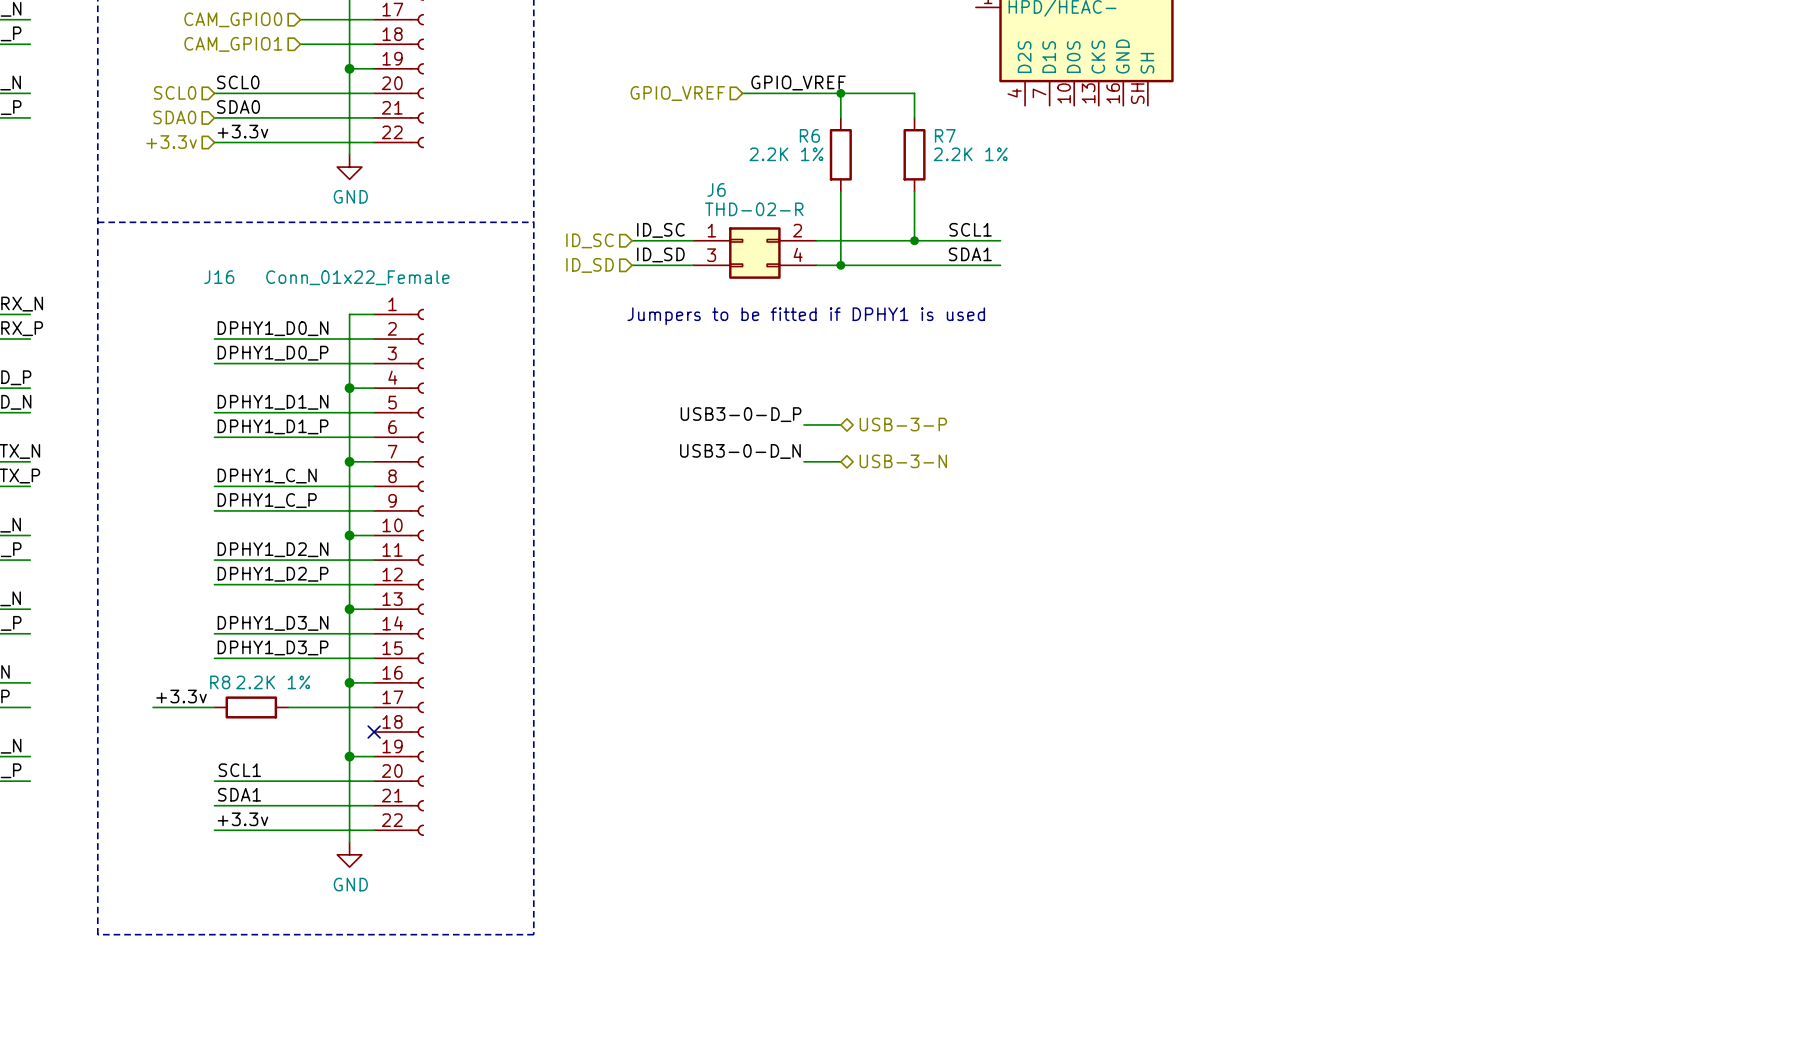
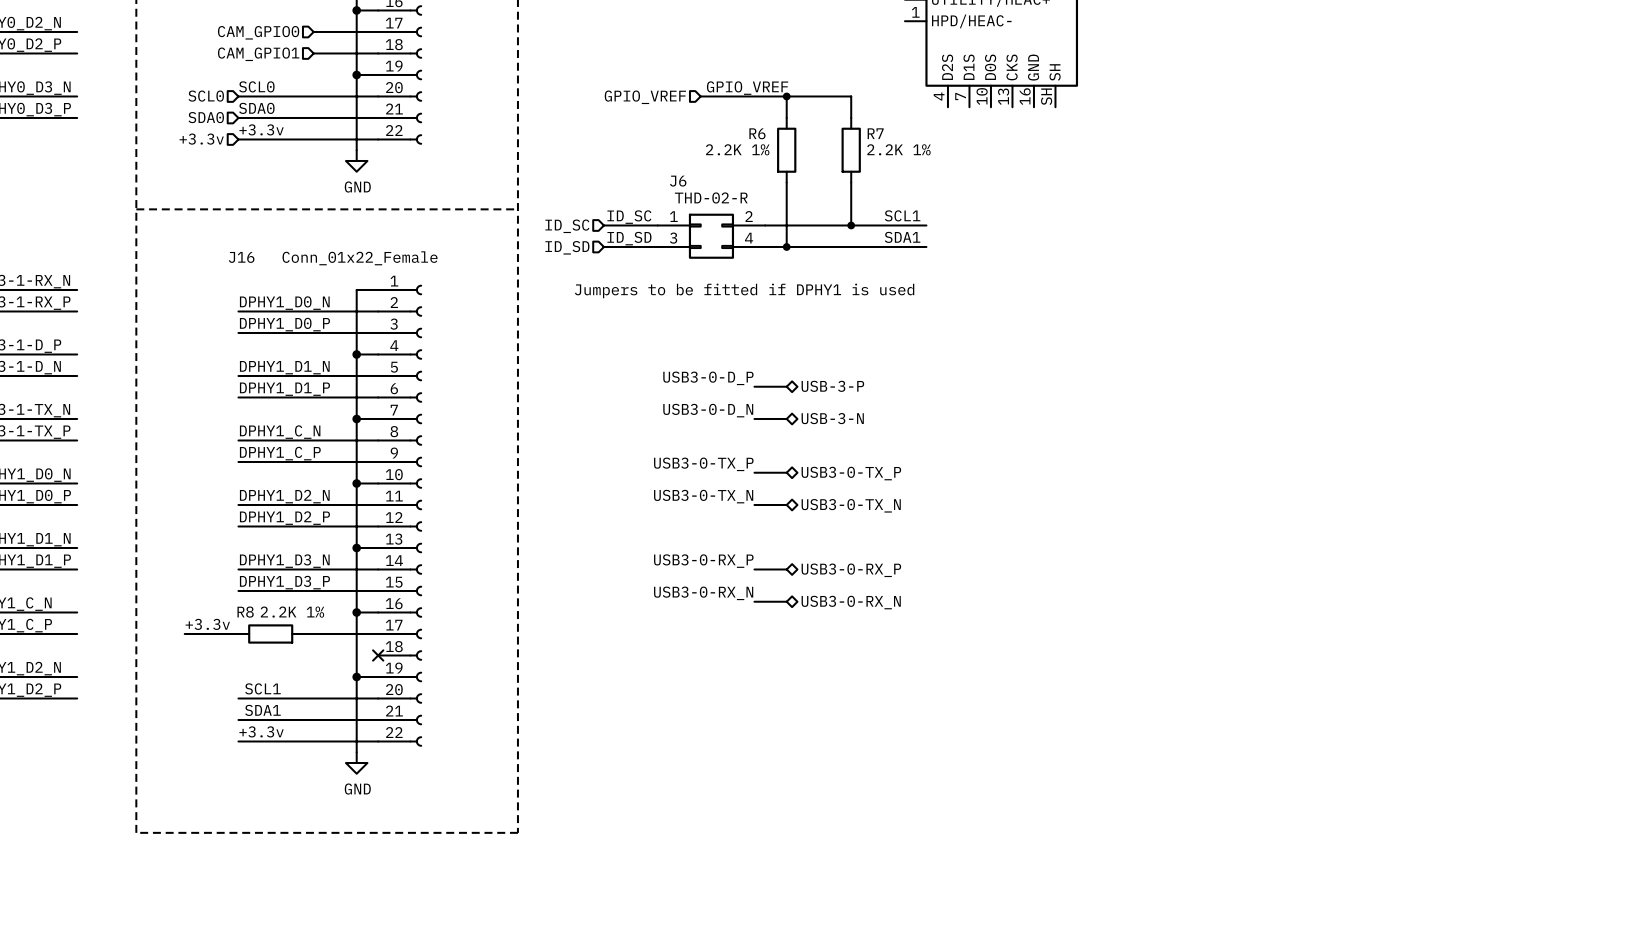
label: none -> USB3-0-TX_P (703, 464)
wire: none -> (754, 472) (786, 472)
hierarchical label: none -> USB3-0-TX_P (851, 473)
label: none -> USB3-0-TX_N (703, 496)
wire: none -> (754, 504) (786, 504)
hierarchical label: none -> USB3-0-TX_N (851, 505)
label: none -> USB3-0-RX_P (703, 561)
wire: none -> (754, 569) (786, 569)
hierarchical label: none -> USB3-0-RX_P (851, 570)
label: none -> USB3-0-RX_N (703, 593)
wire: none -> (754, 601) (786, 601)
hierarchical label: none -> USB3-0-RX_N (851, 602)

